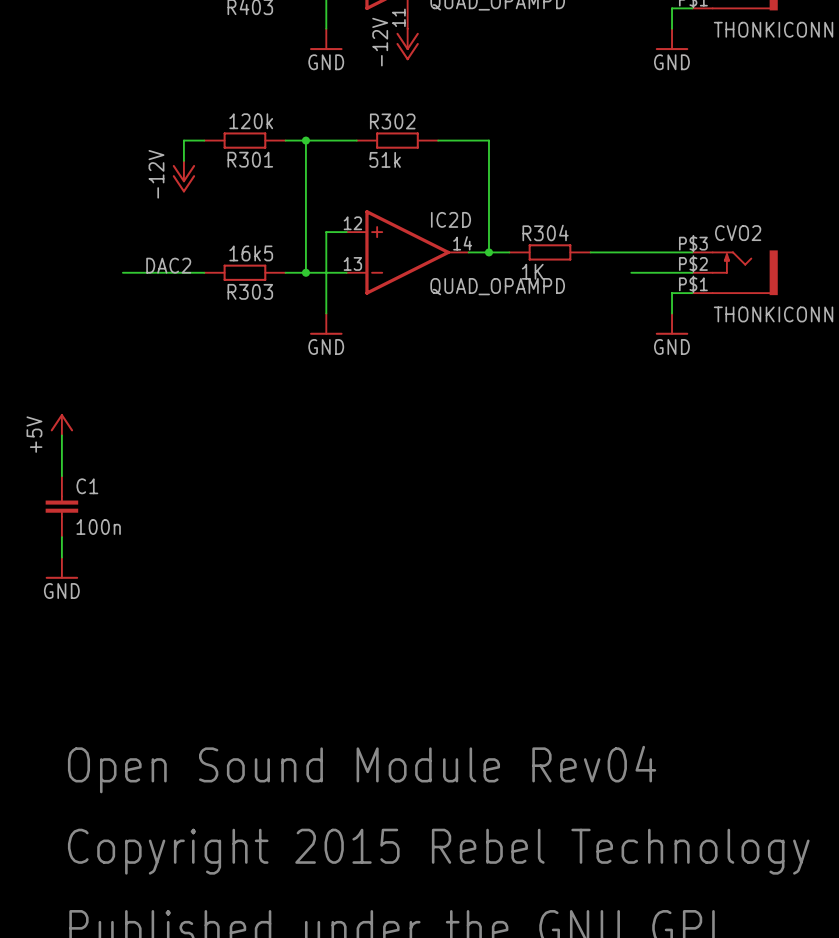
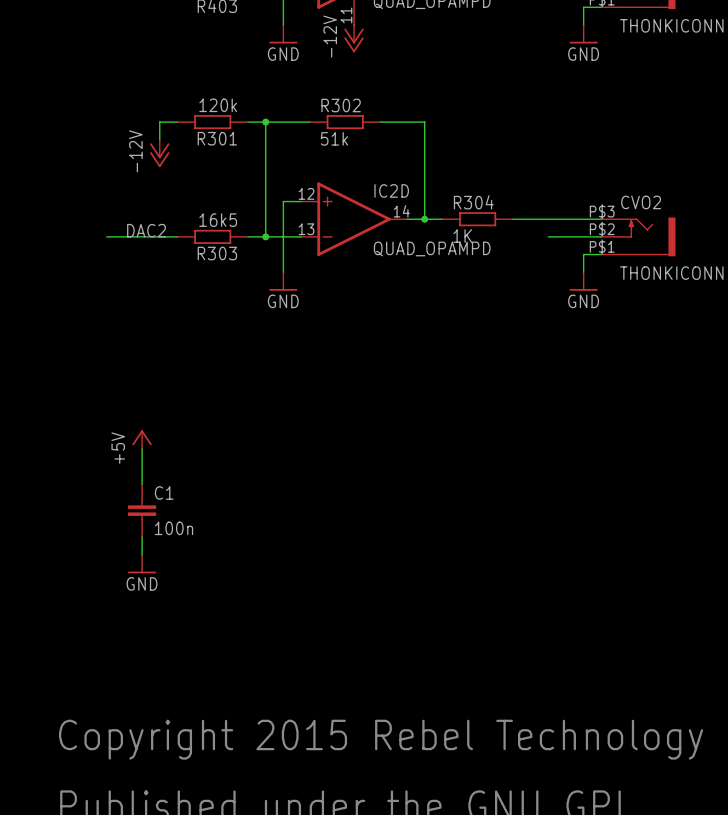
power symbol position: +5V (61, 424) -> +5V (142, 439)
wire: (61, 435) (61, 476) -> (142, 448) (142, 484)
C1 position: (61, 506) -> (142, 510)
wire: (61, 537) (61, 557) -> (142, 537) (142, 554)
power symbol position: GND (61, 568) -> GND (142, 564)
text: Open Sound Module Rev04 (362, 769) -> none

